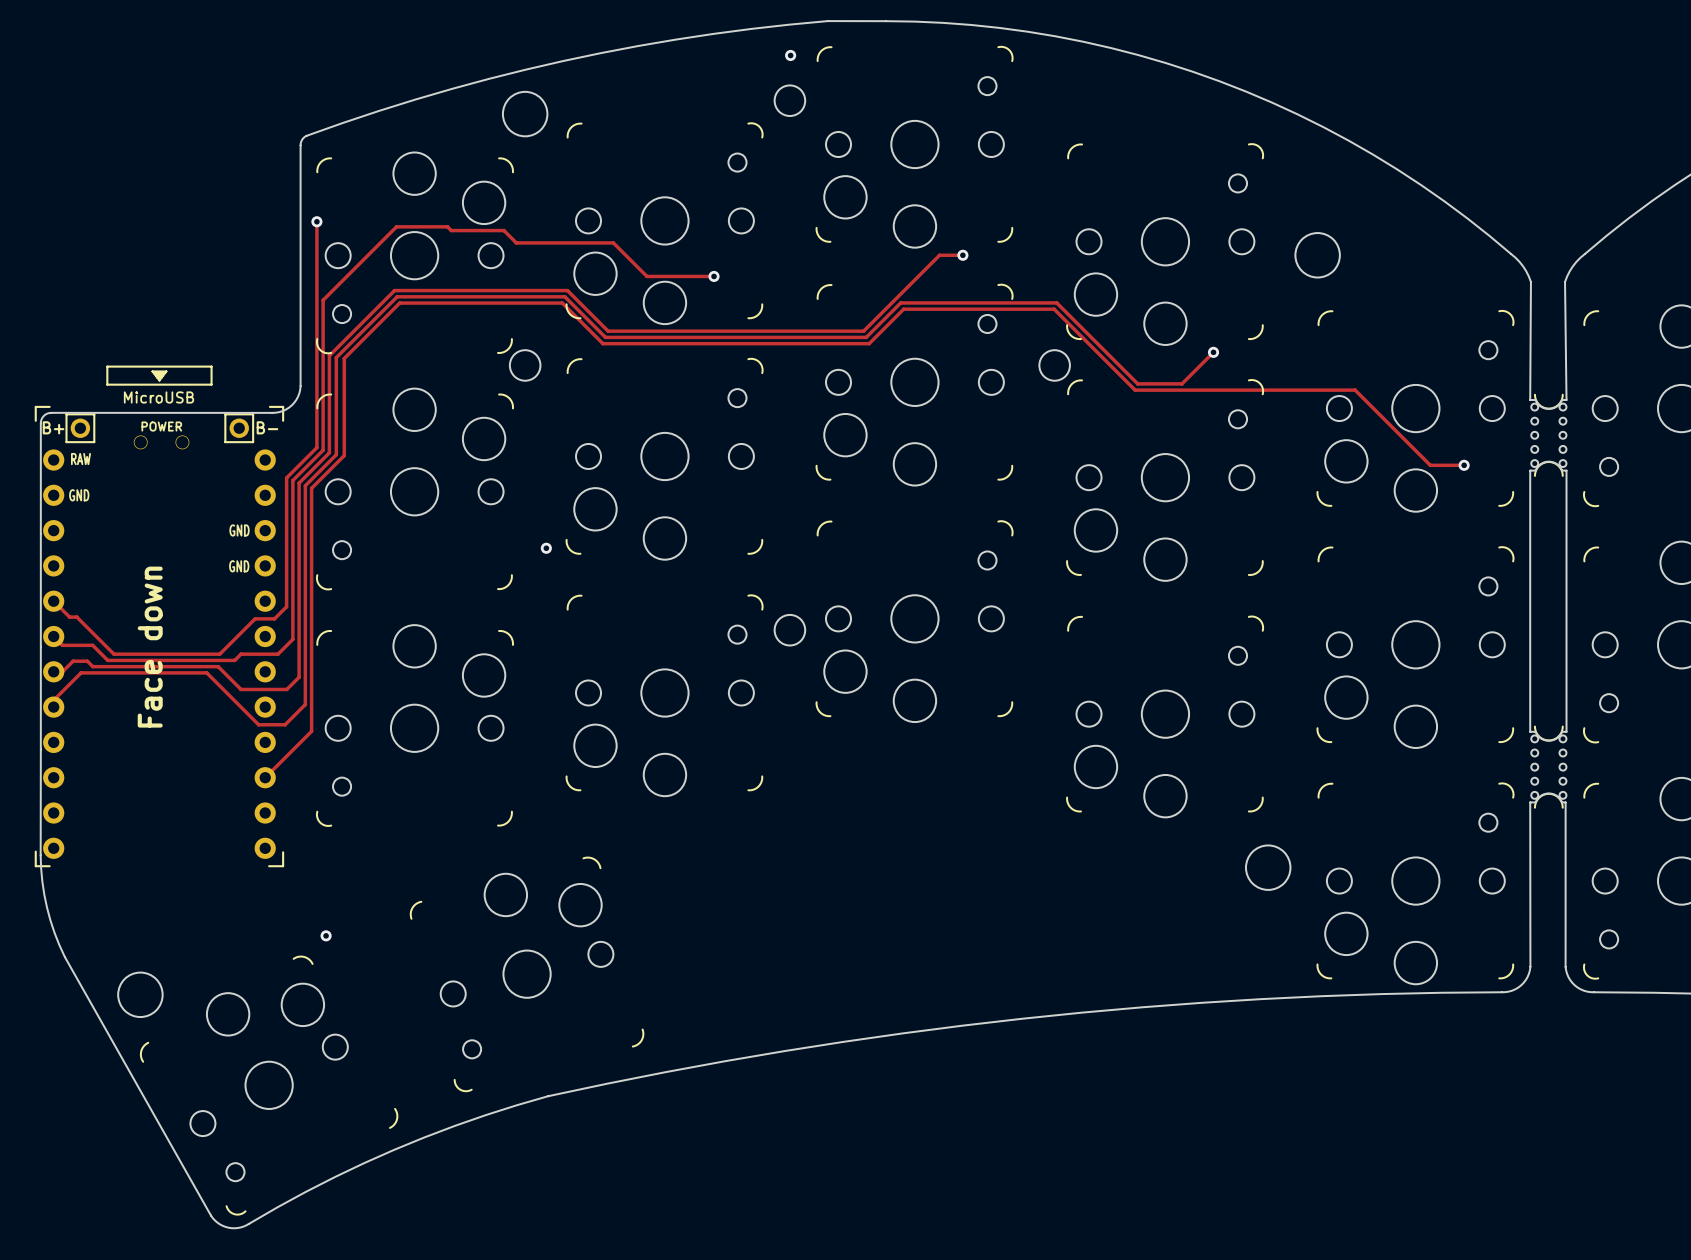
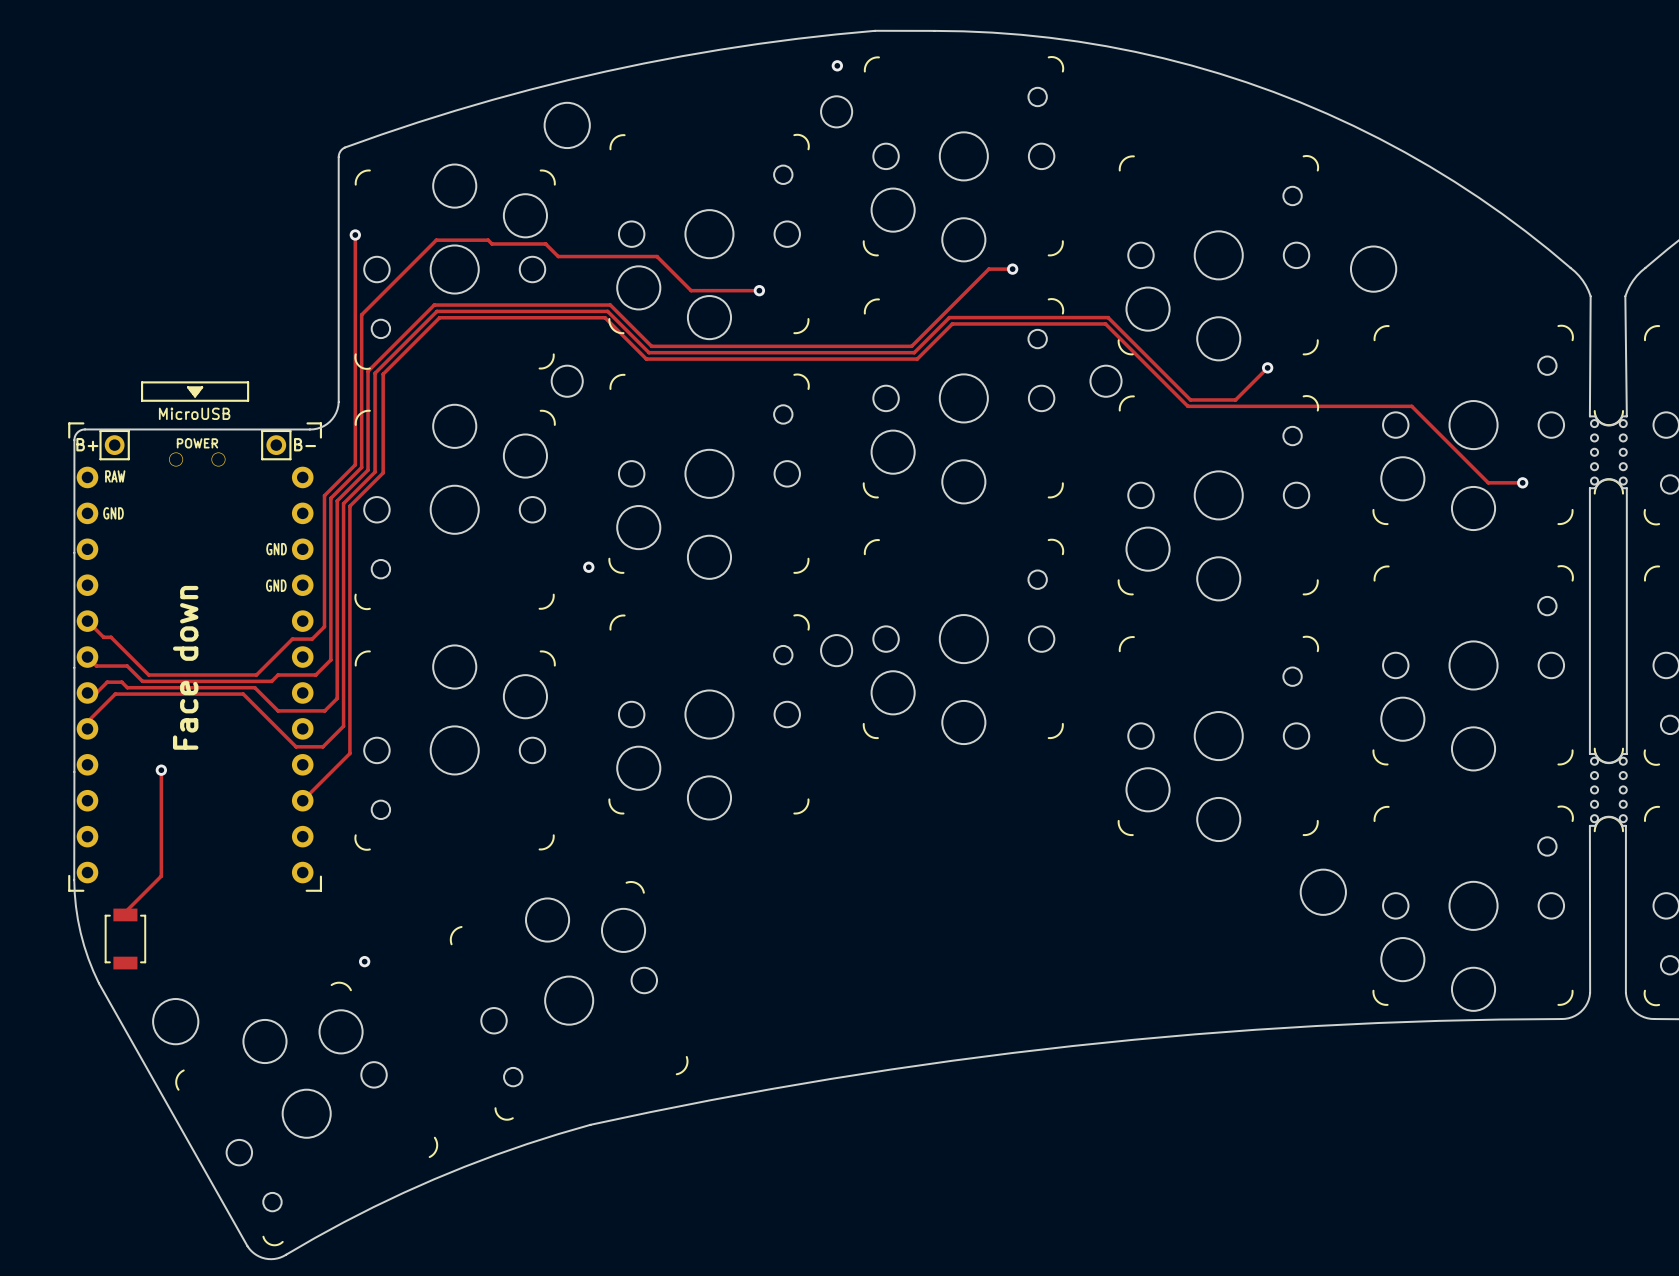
track: none -> (161, 770) (161, 876) (125, 912) (125, 914)
via: none -> (161, 770)
part: none -> (125, 939)

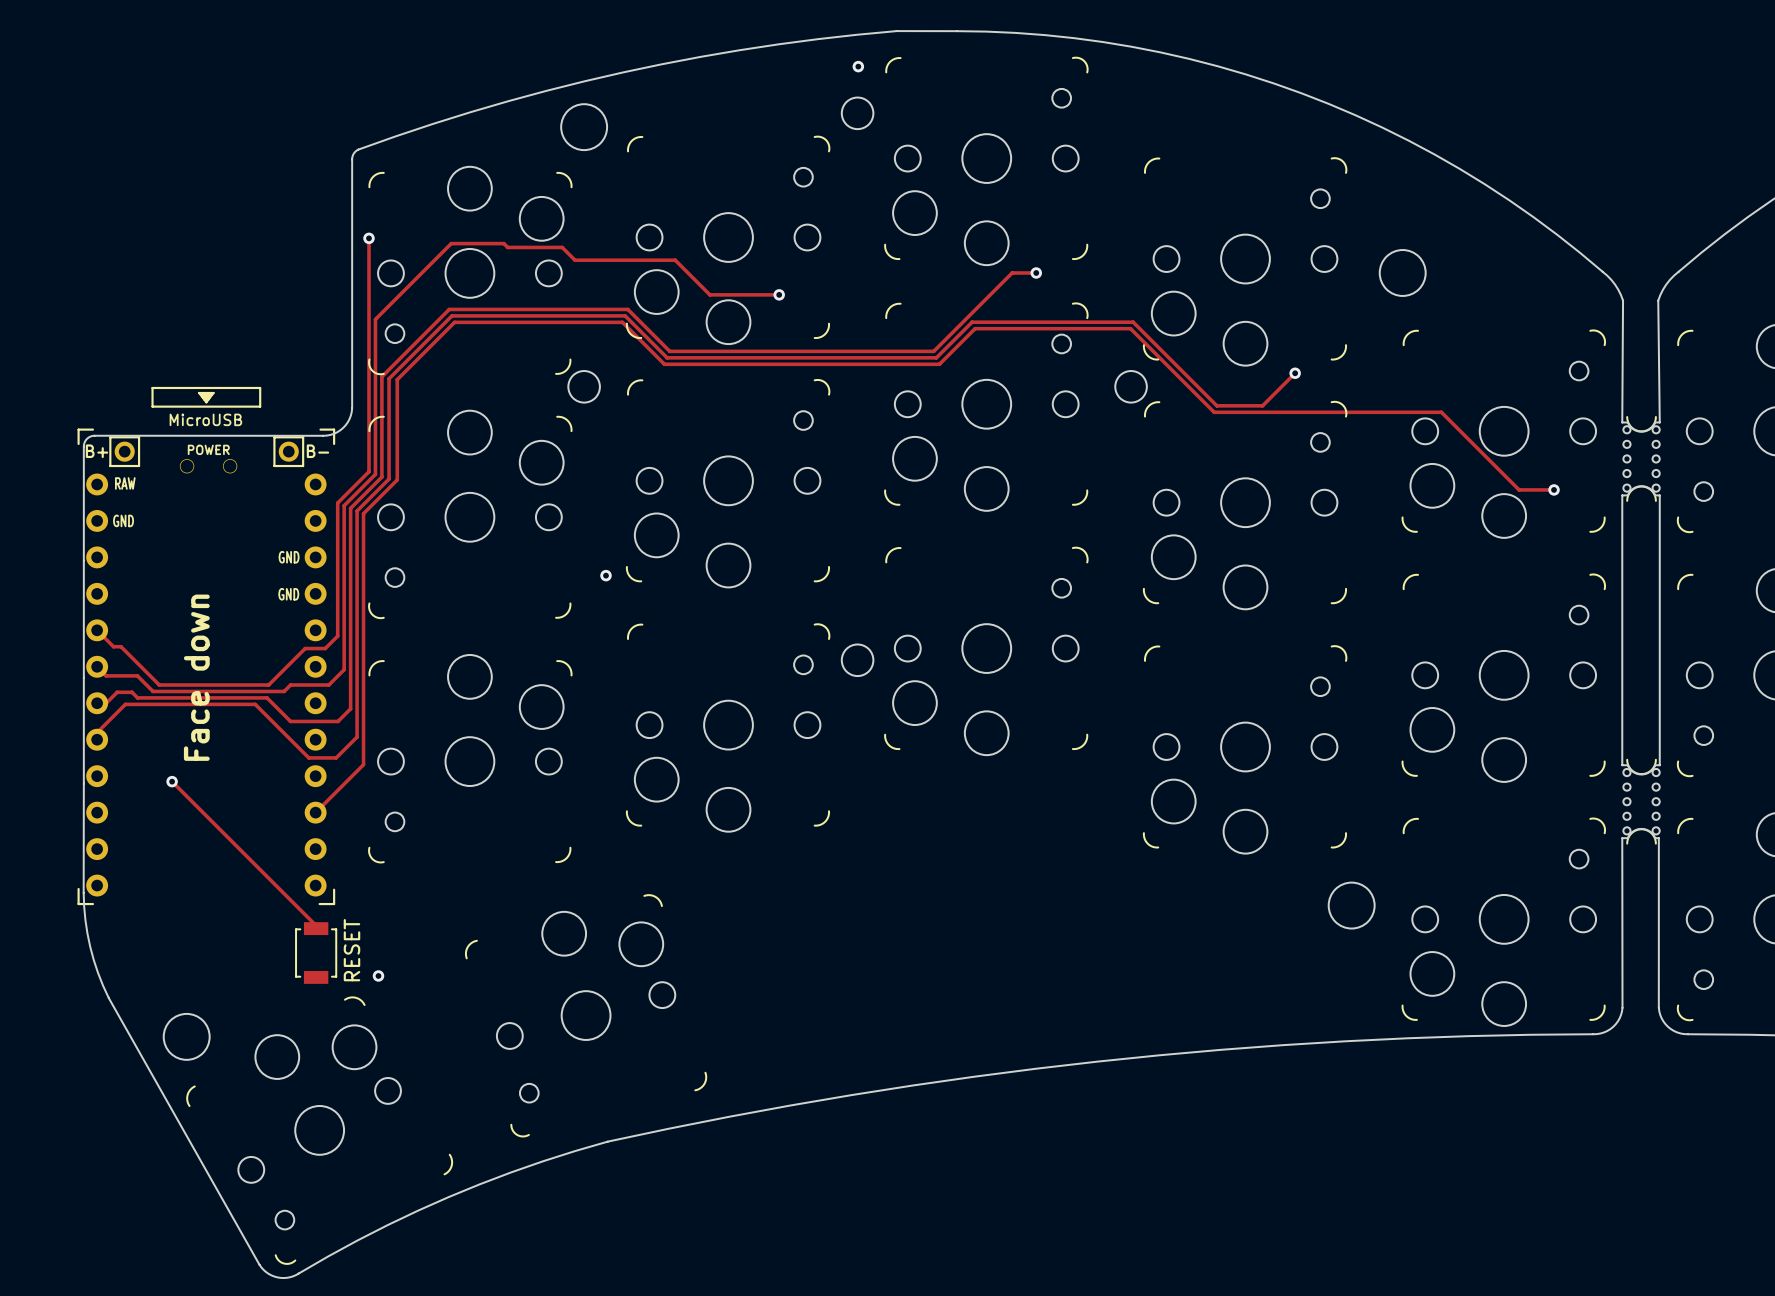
track: (161, 770) (161, 876) (125, 912) (125, 914) -> (172, 781) (316, 925)
part: (125, 939) -> none
part: none -> (316, 953)

